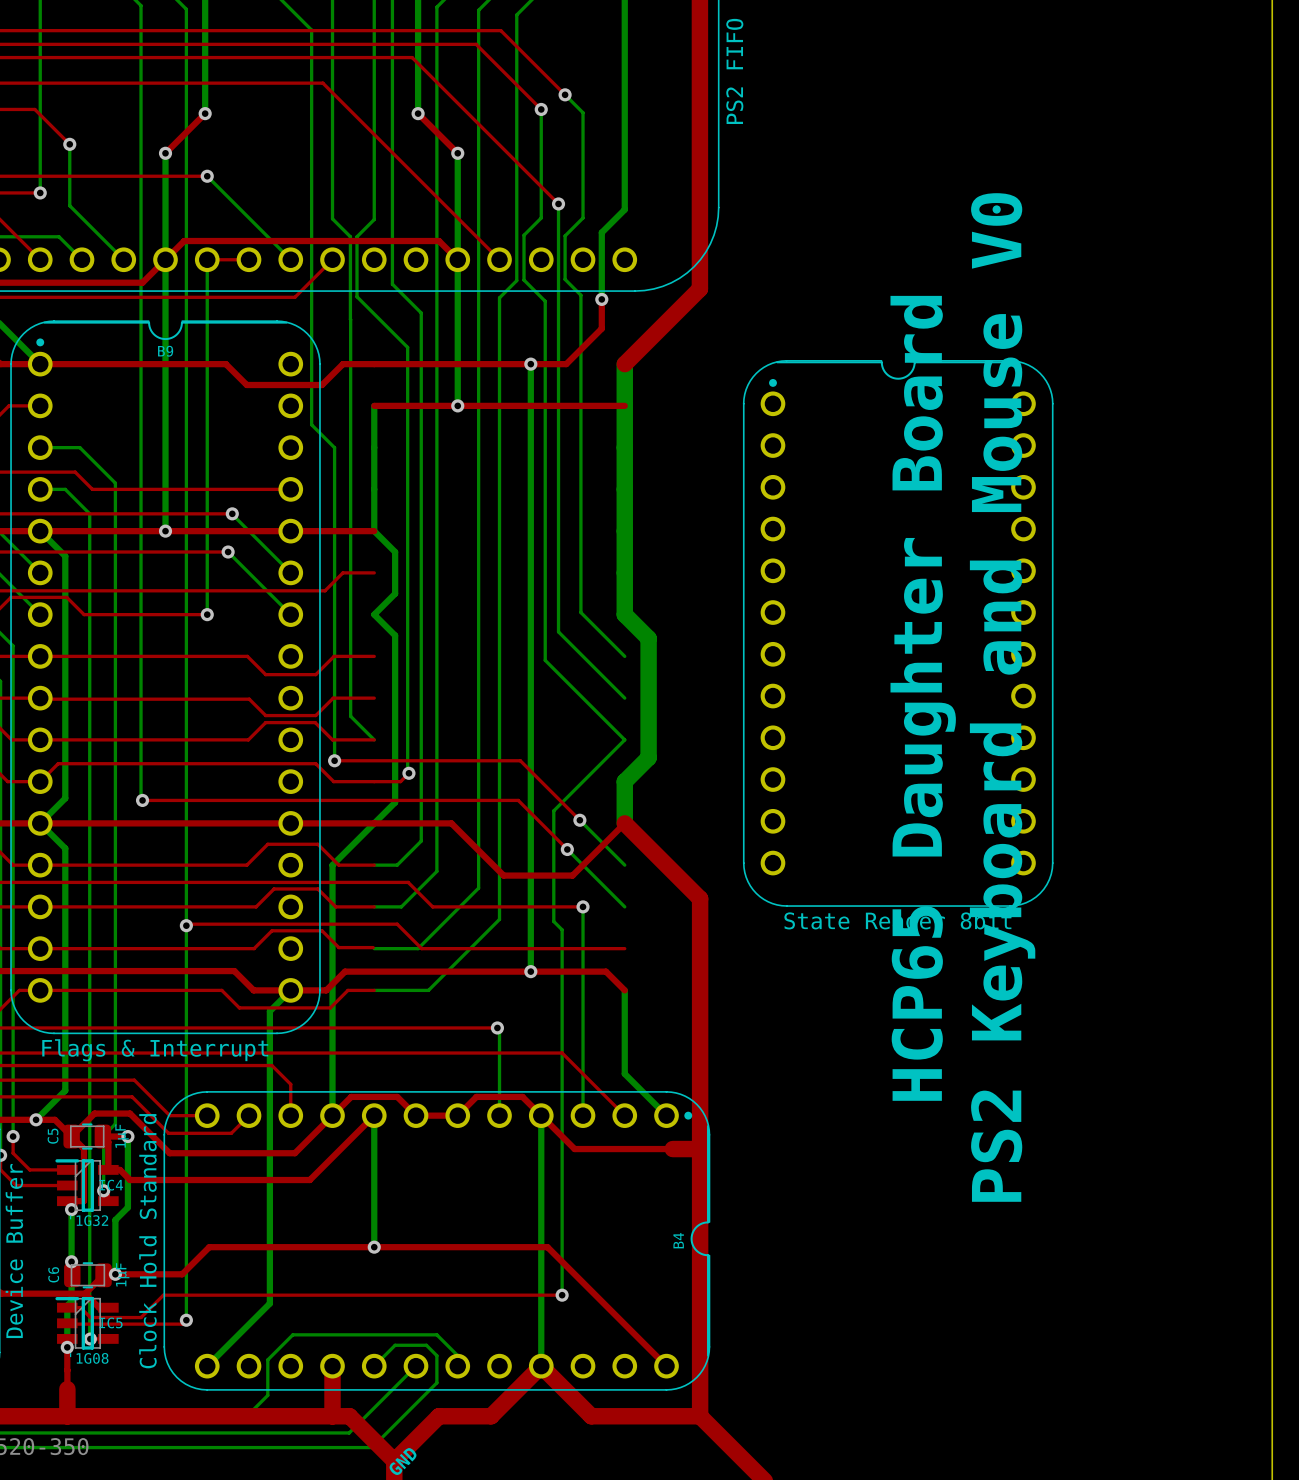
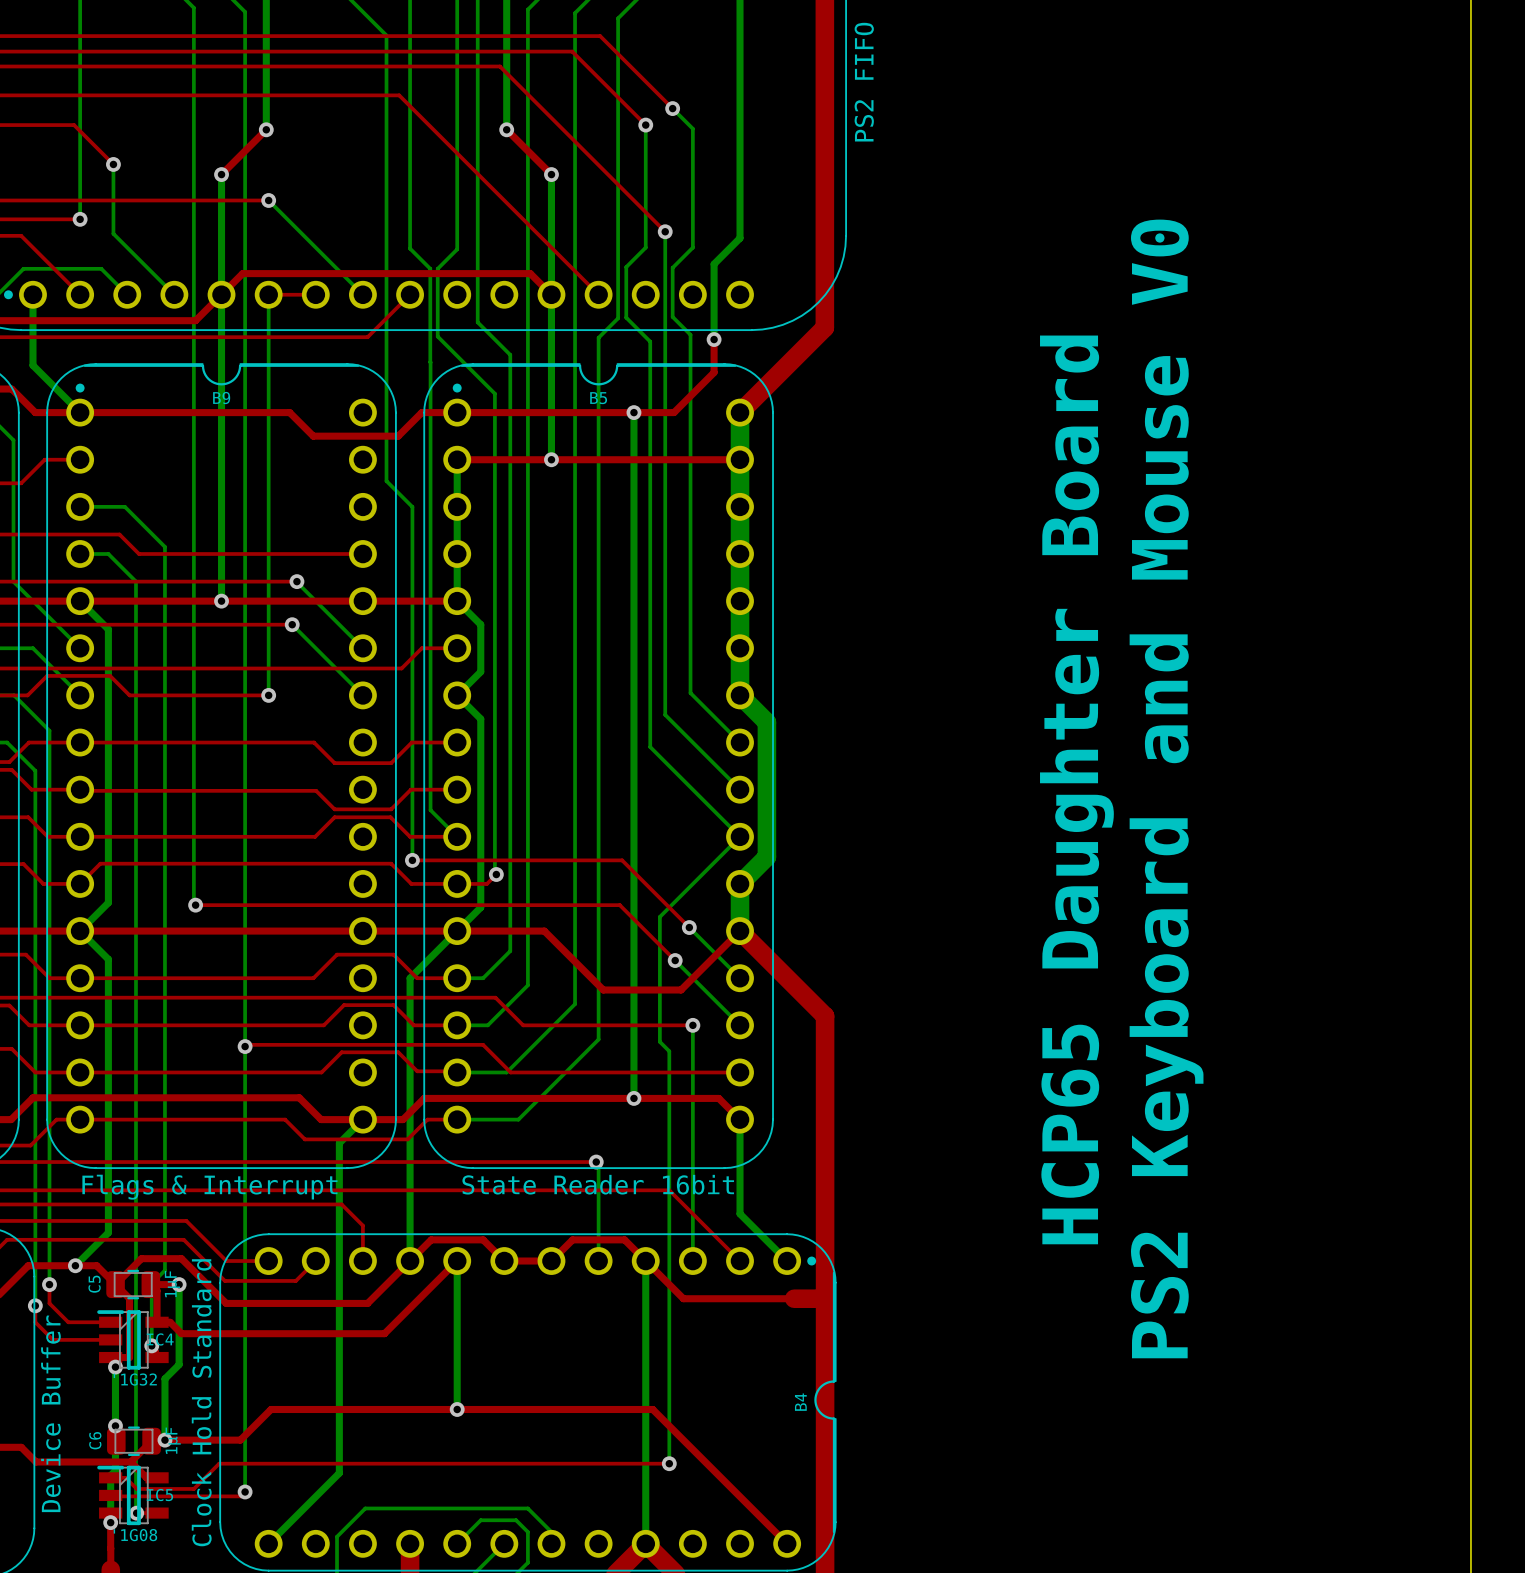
part: (898, 633) -> none
B5: none -> (598, 766)

